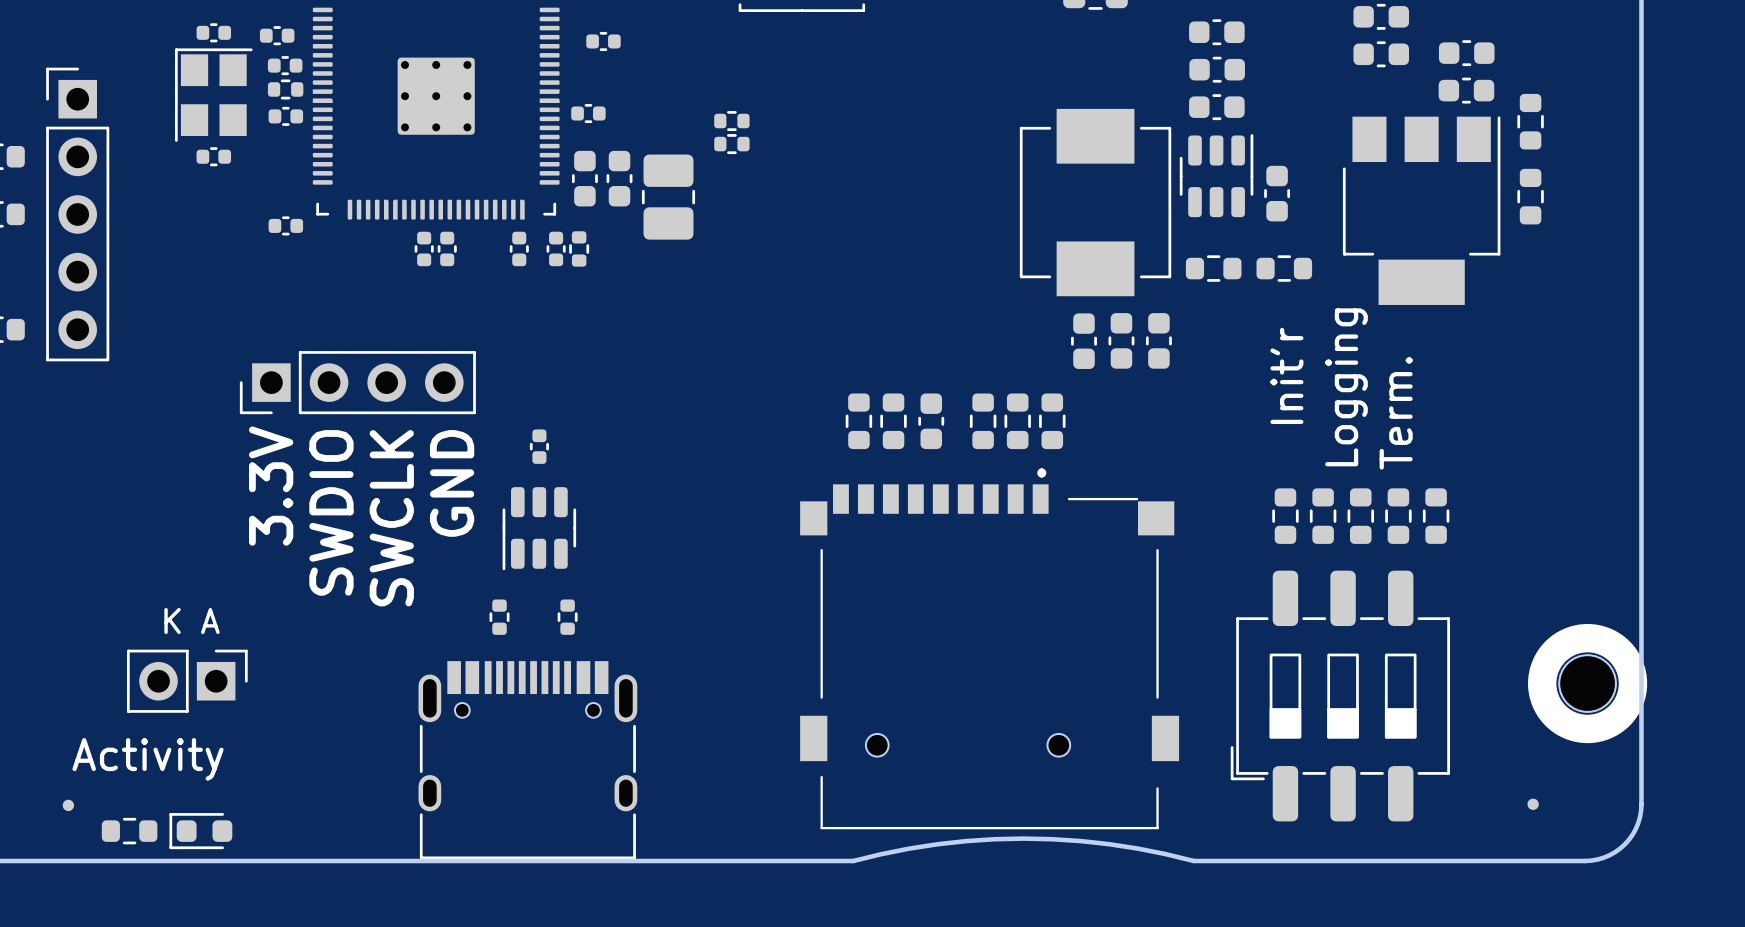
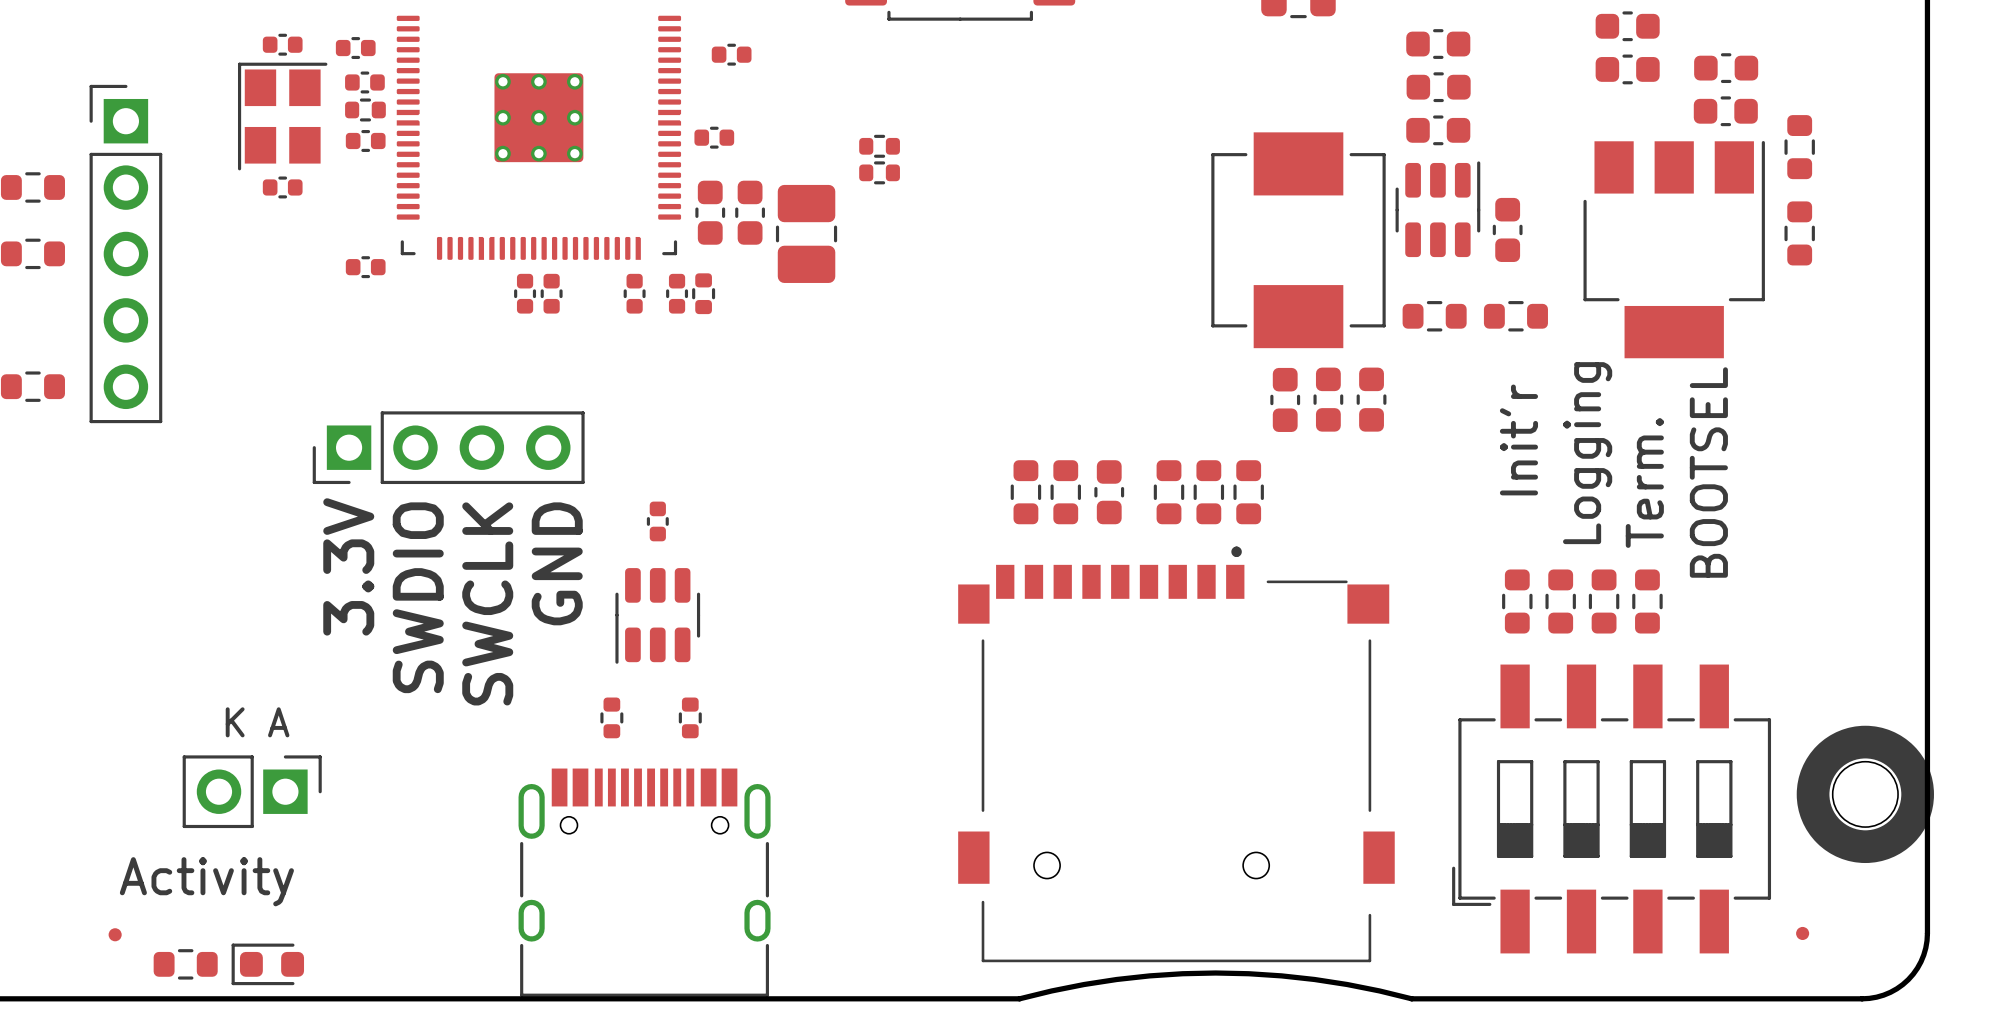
text: none -> BOOTSEL (1708, 472)
part: (1436, 516) -> none
part: (1340, 696) -> none
part: none -> (1611, 808)

